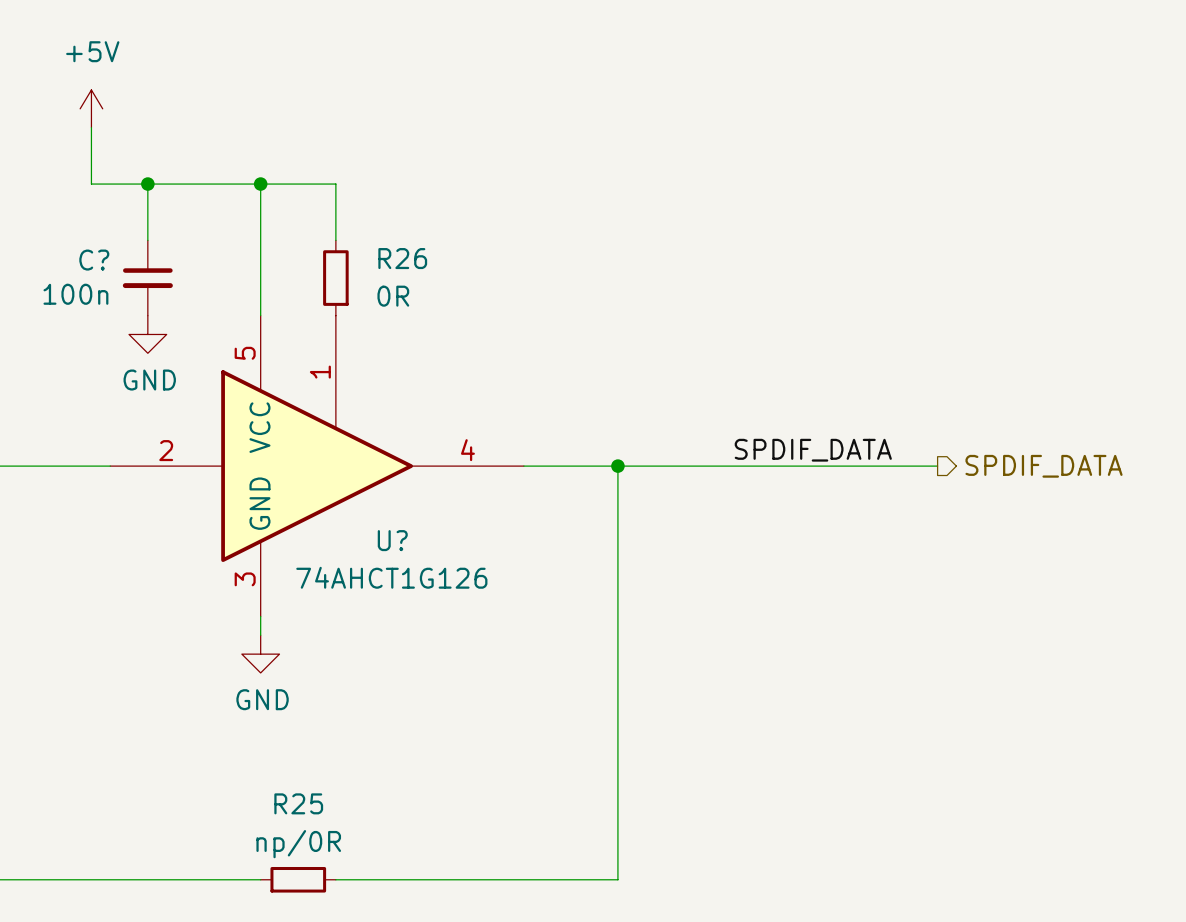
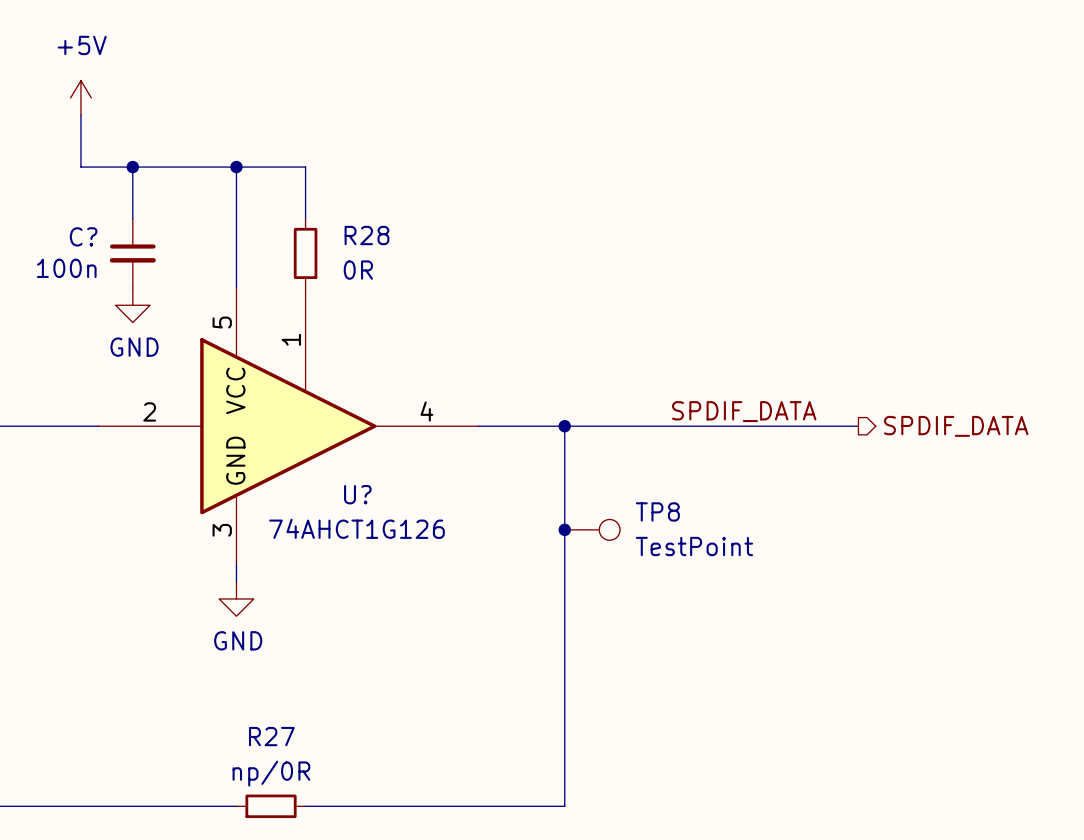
R26 name: R26 (402, 258) -> R28 (367, 235)
junction: none -> (564, 529)
TP8: none -> TestPoint (592, 529)
R25 name: R25 (298, 803) -> R27 (271, 736)

